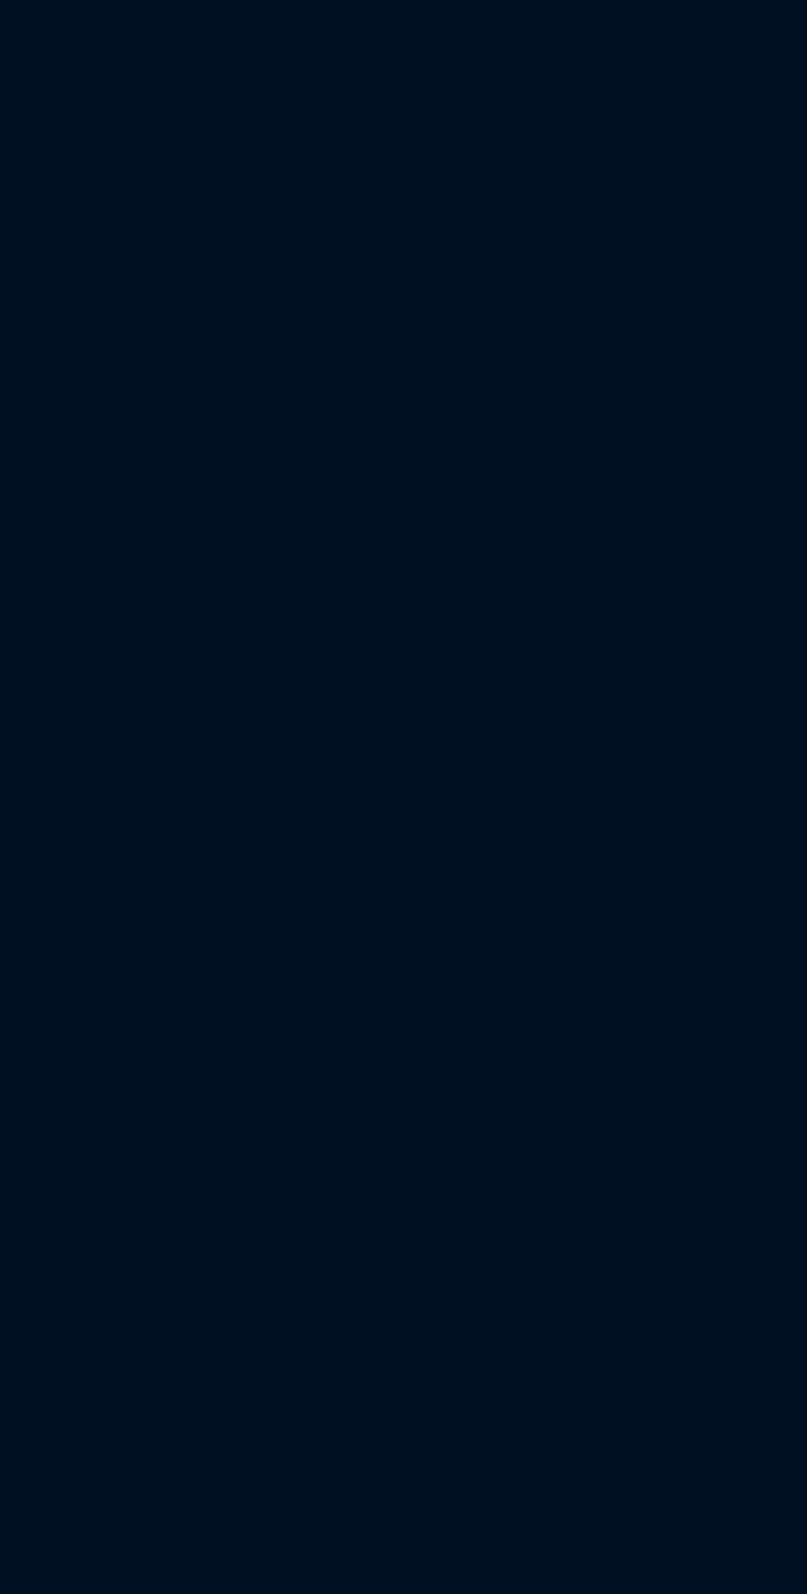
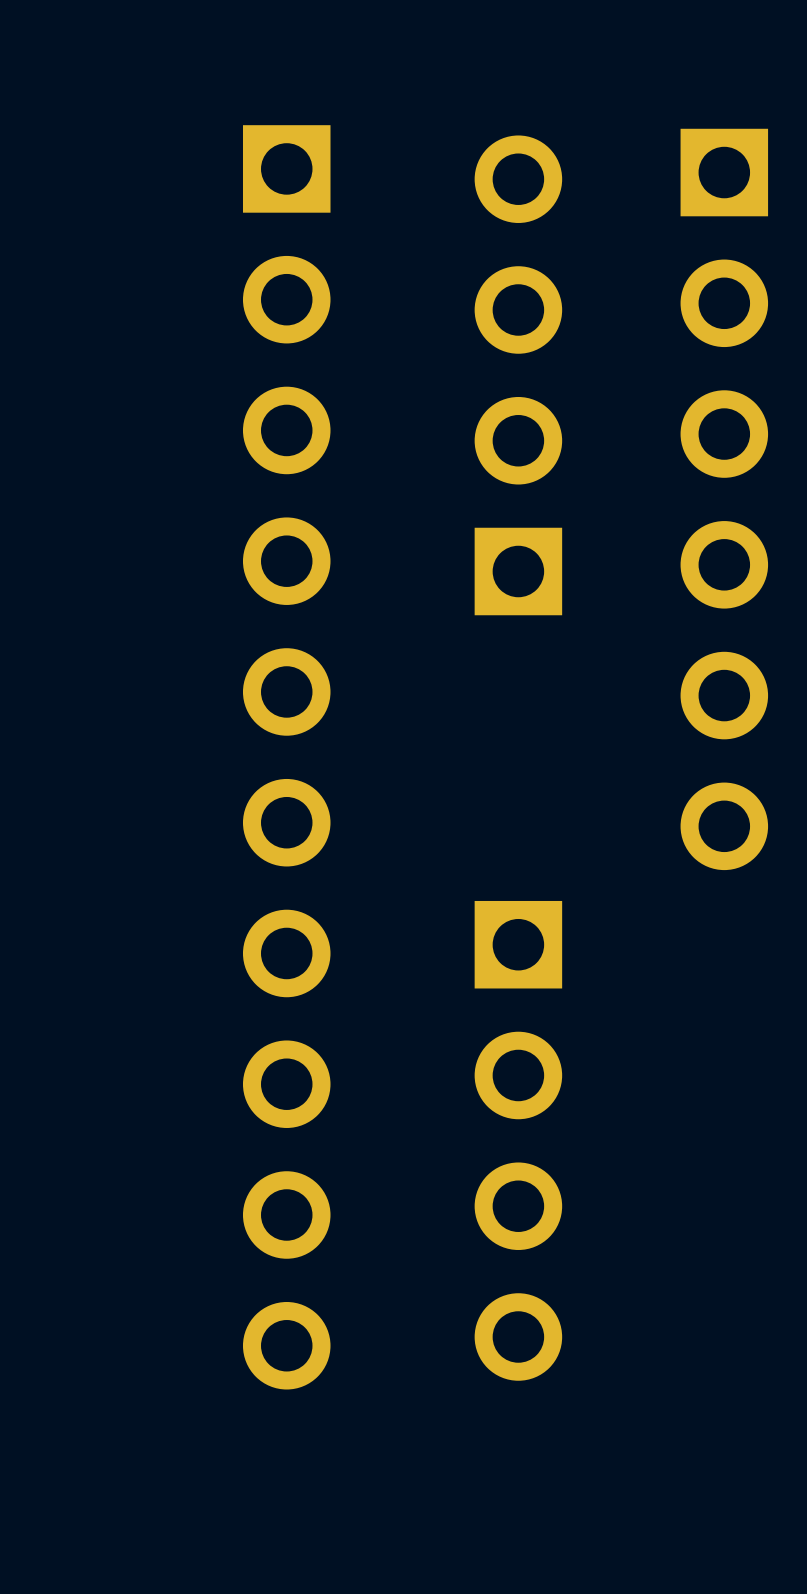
part: none -> (518, 375)
part: none -> (724, 499)
part: none -> (286, 757)
part: none -> (518, 1140)

